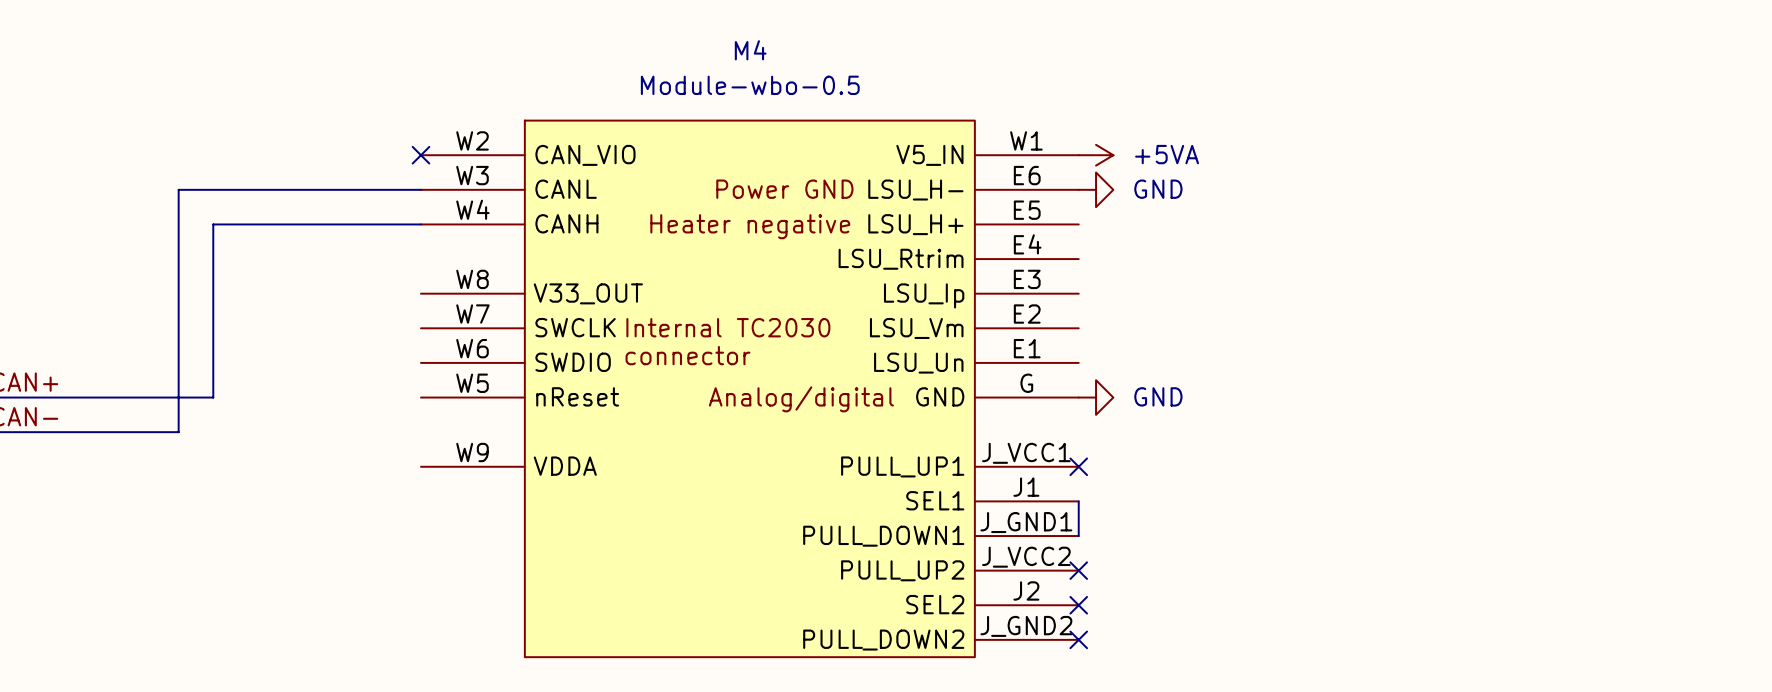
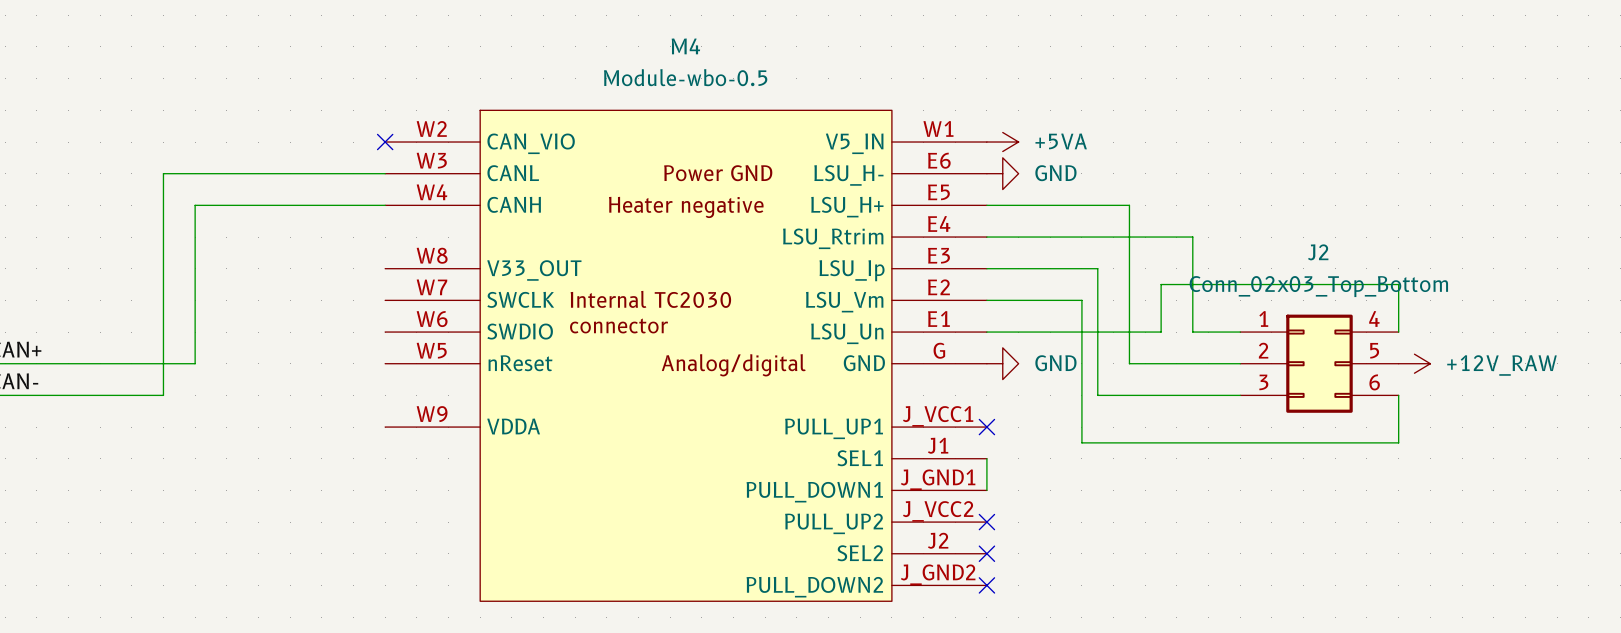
wire: none -> (986, 205) (1129, 205) (1129, 363) (1240, 363)
wire: none -> (986, 237) (1192, 237) (1192, 332) (1240, 332)
wire: none -> (986, 268) (1097, 268) (1097, 395) (1240, 395)
wire: none -> (986, 300) (1081, 300) (1081, 442) (1398, 442) (1398, 395)
wire: none -> (986, 332) (1161, 332) (1161, 284) (1398, 284) (1398, 332)
J2: none -> Conn_02x03_Top_Bottom (1319, 363)
power symbol: none -> +12V_RAW (1414, 363)

